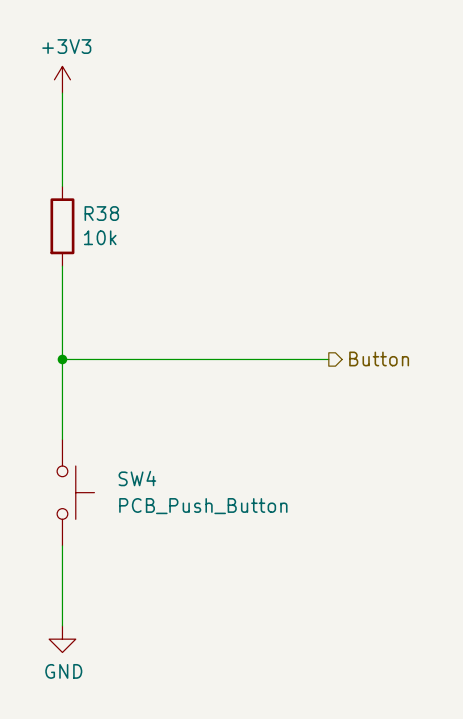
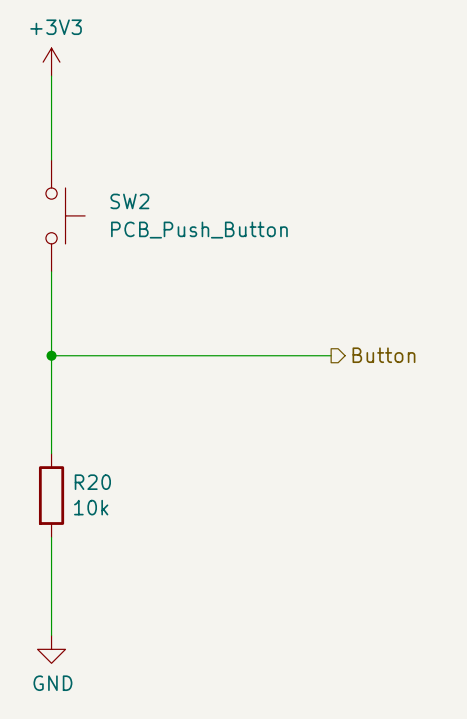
R38: 10k (62, 226) -> none
SW2: none -> PCB_Push_Button (65, 215)
R20: none -> 10k (51, 495)
SW4: PCB_Push_Button (75, 492) -> none

